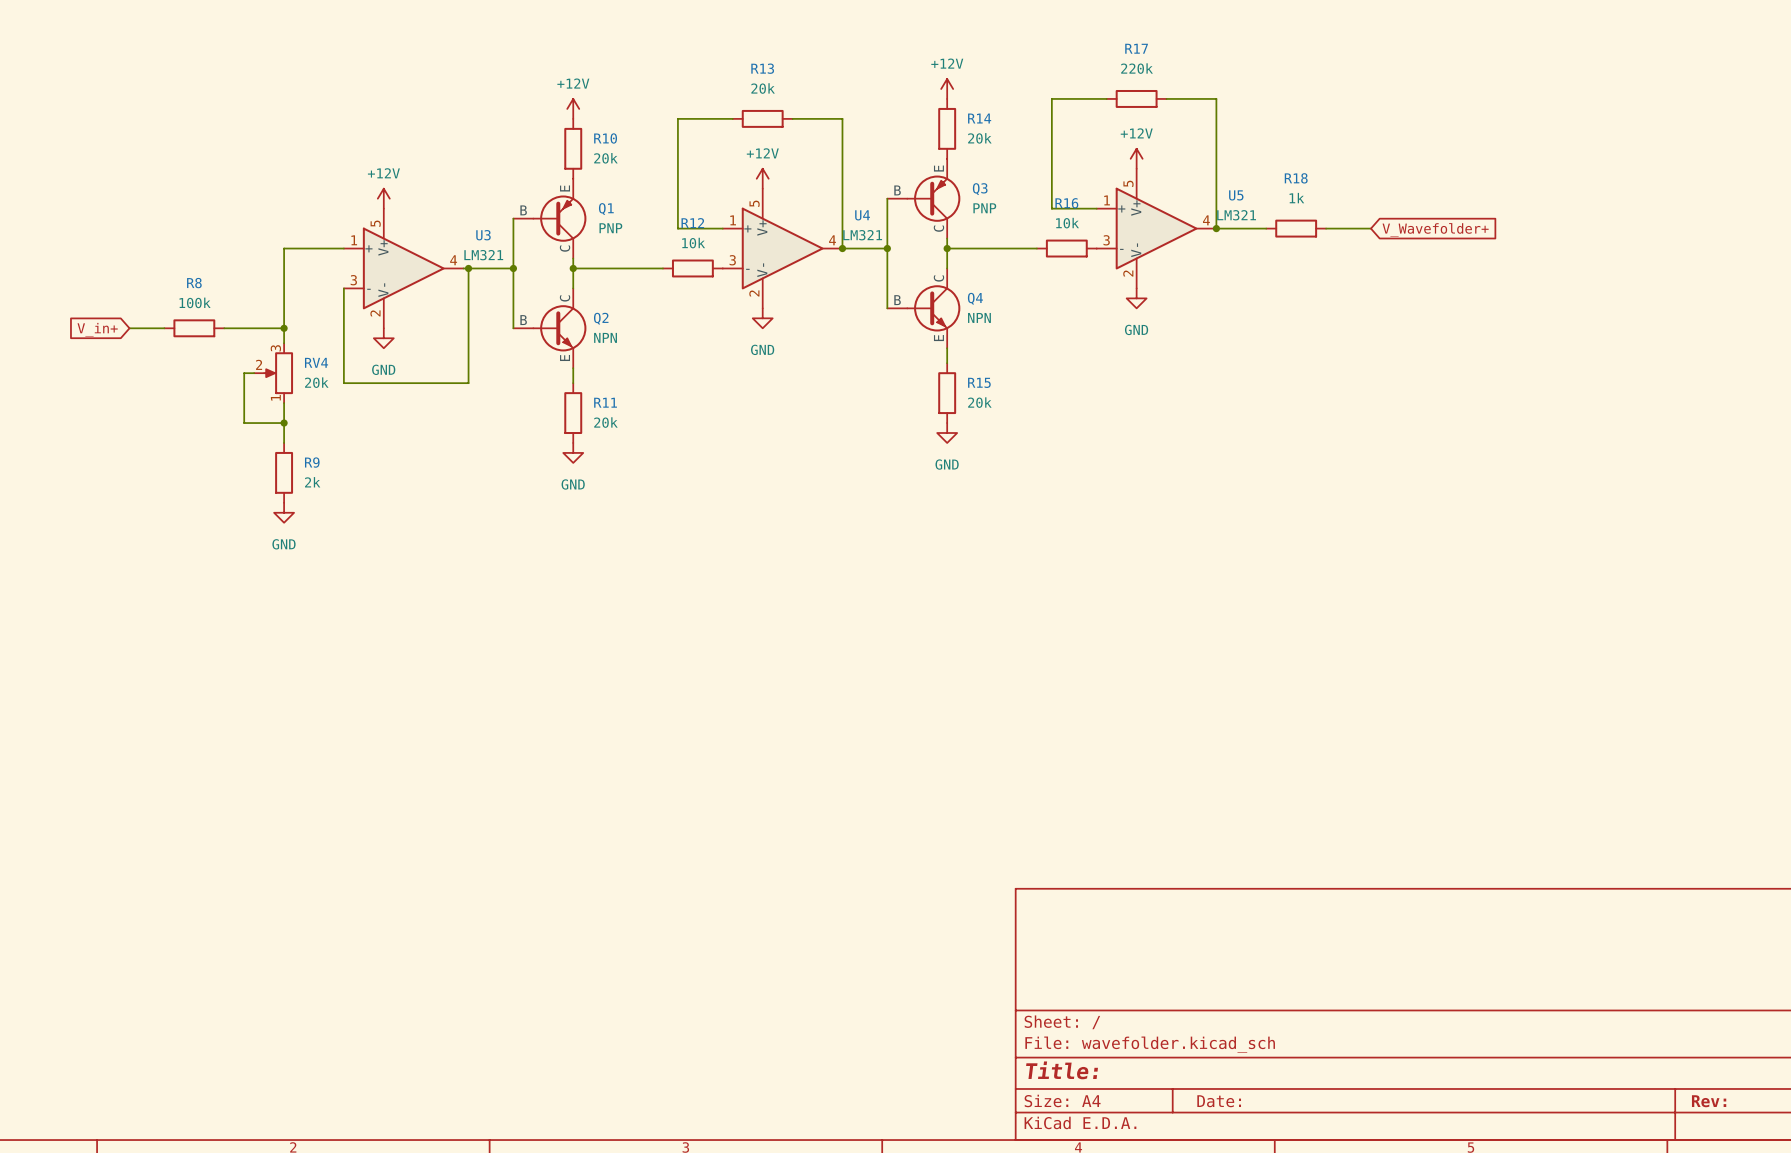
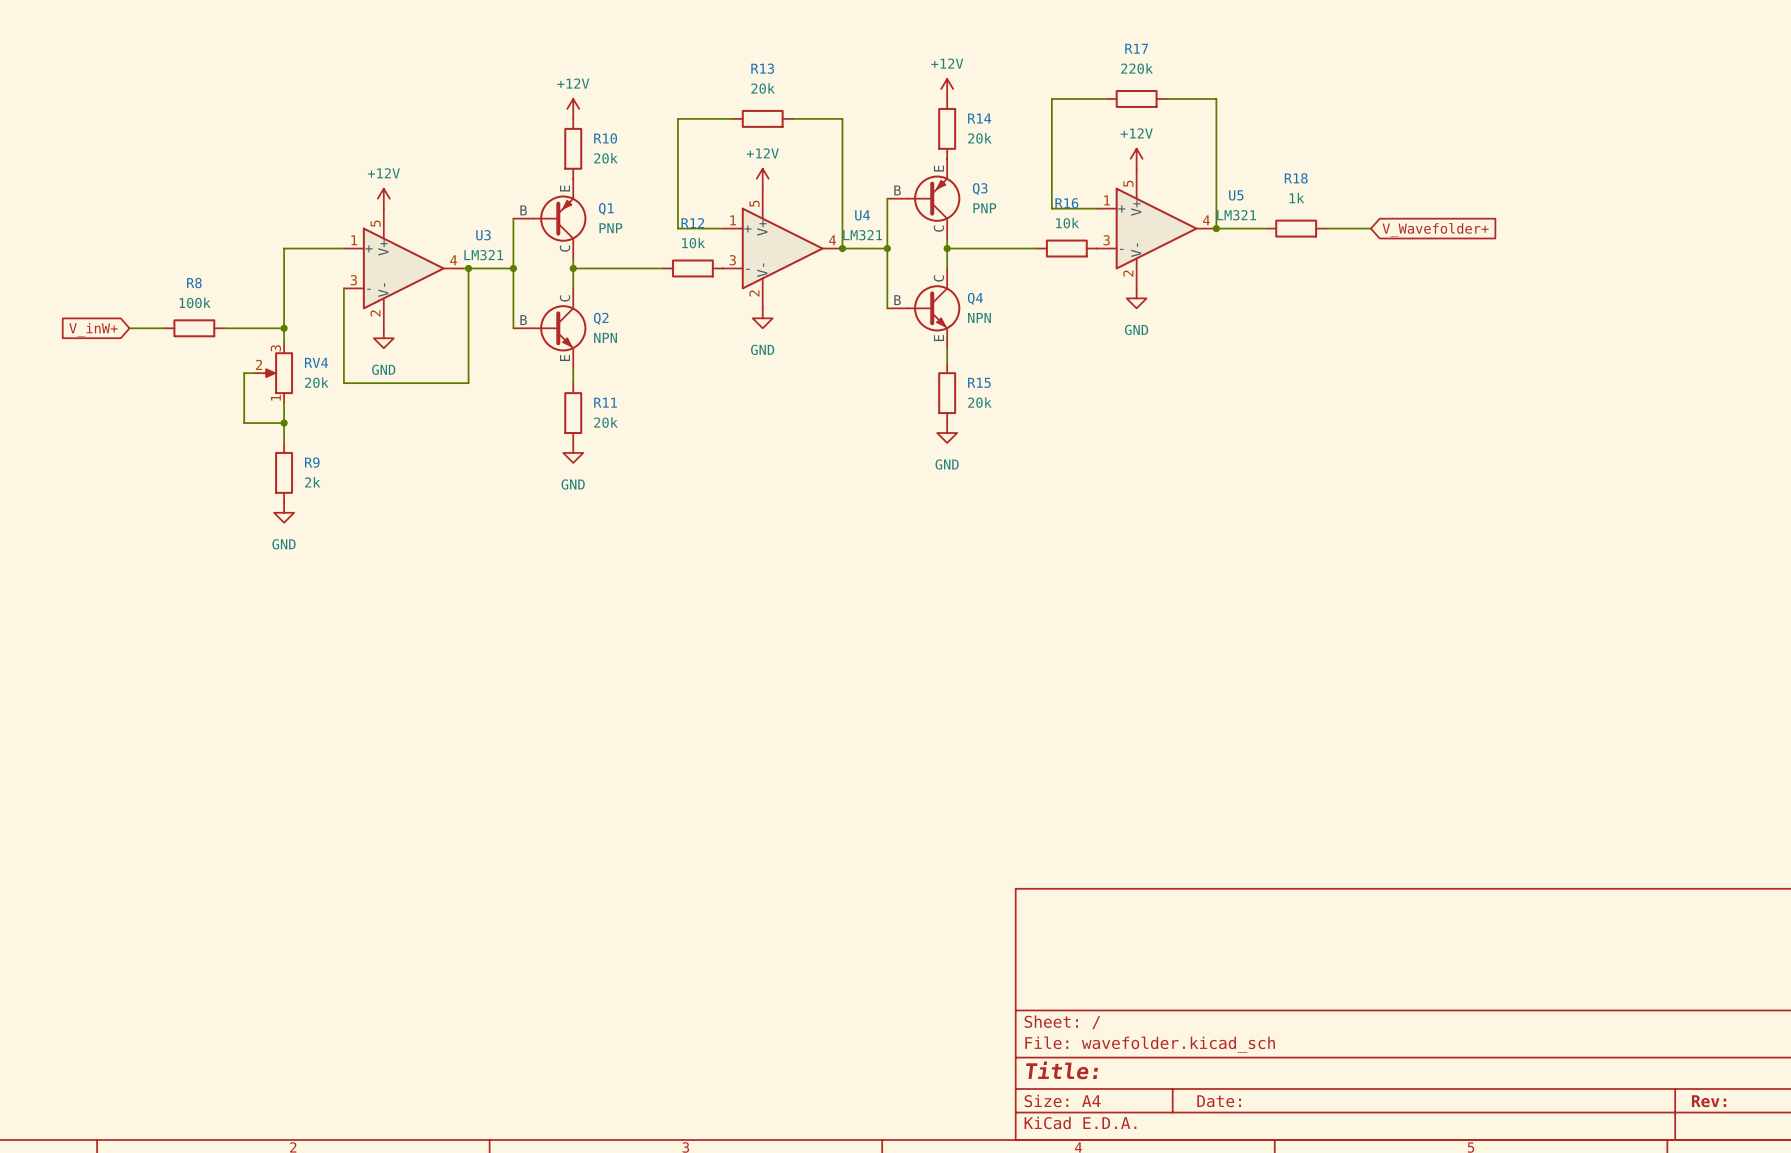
global label: V_in+ (97, 329) -> V_inW+ (93, 329)

